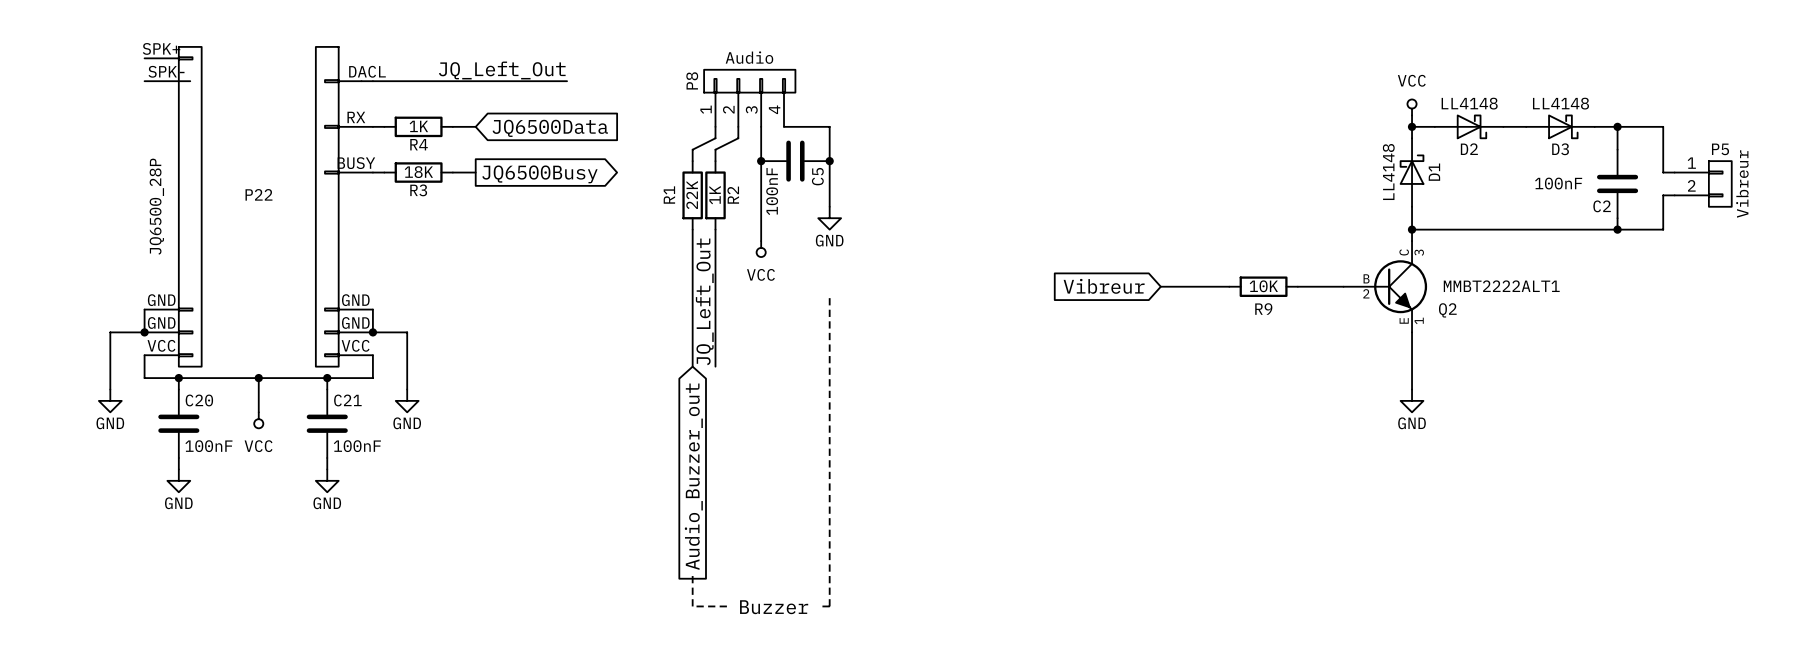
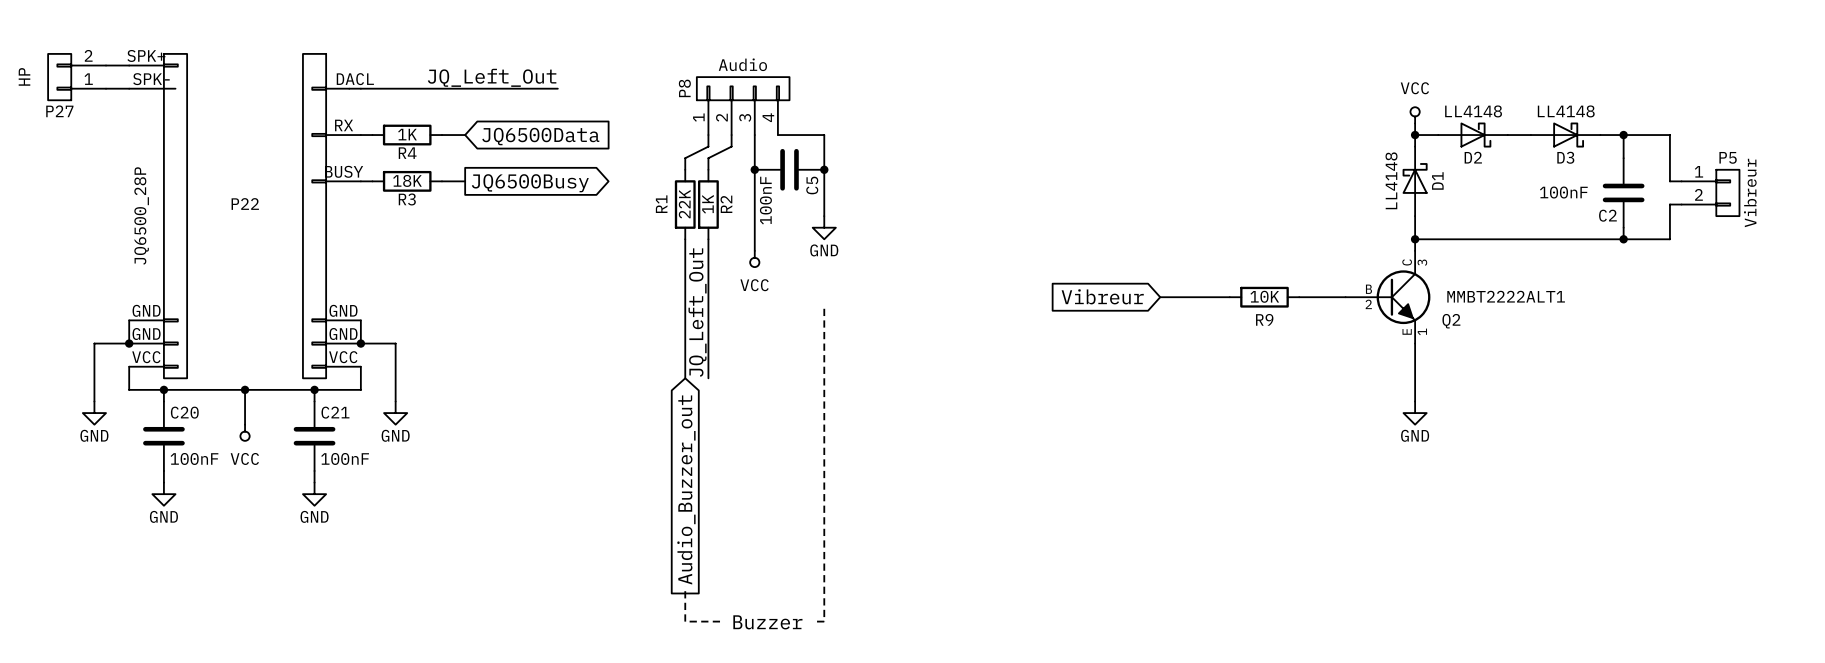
wire: none -> (106, 65) (129, 65)
P27: none -> HP (77, 77)
wire: none -> (106, 88) (129, 88)

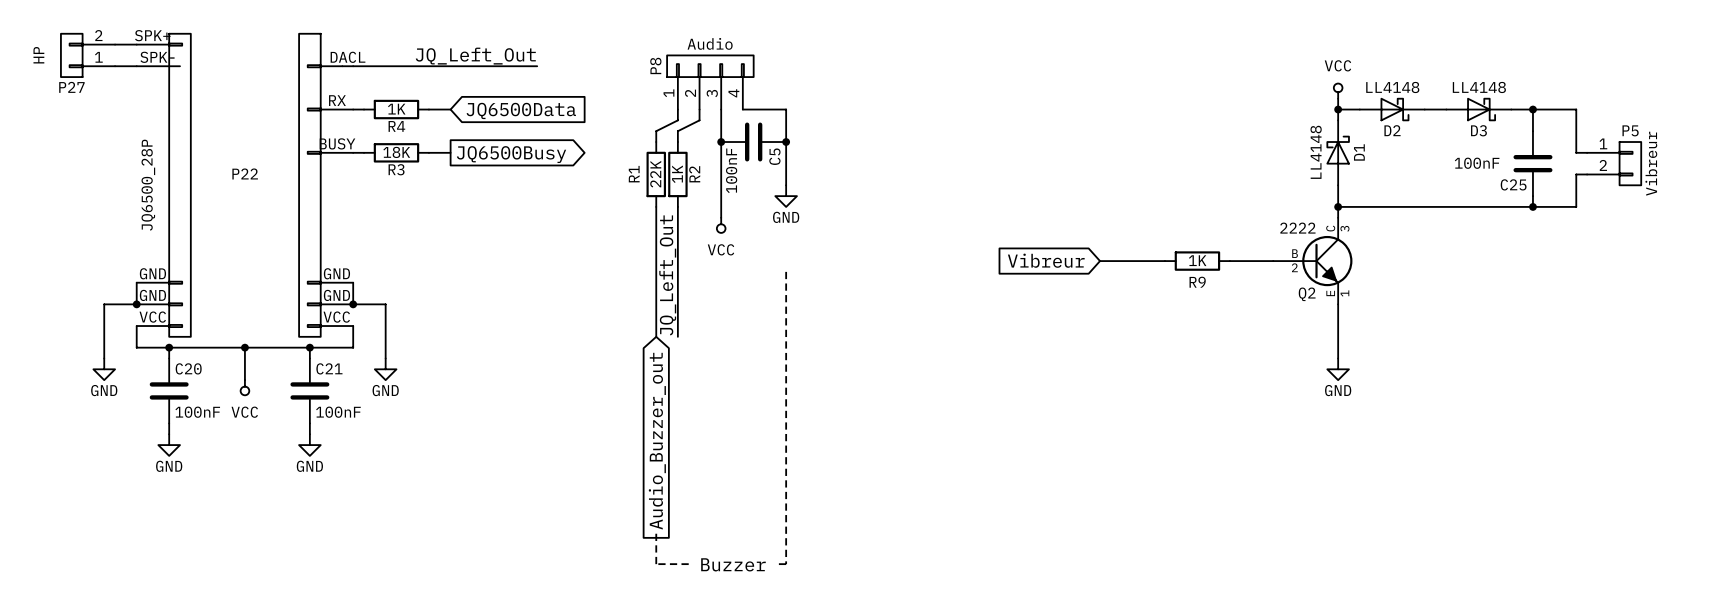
C2 name: C2 (1607, 215) -> C25 (1513, 184)
R9 value: 10K (1264, 296) -> 1K (1197, 260)
Q2 value: MMBT2222ALT1 (1506, 296) -> 2222 (1297, 228)
Q2 name position: Q2 (1451, 321) -> Q2 (1307, 294)

